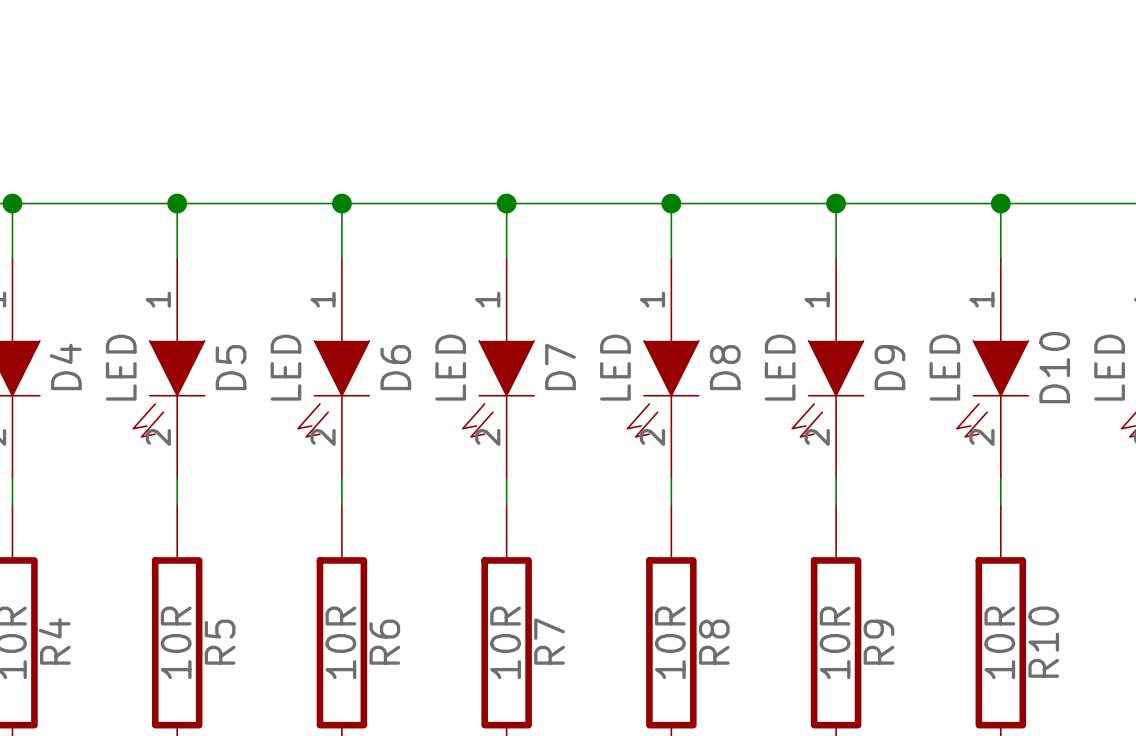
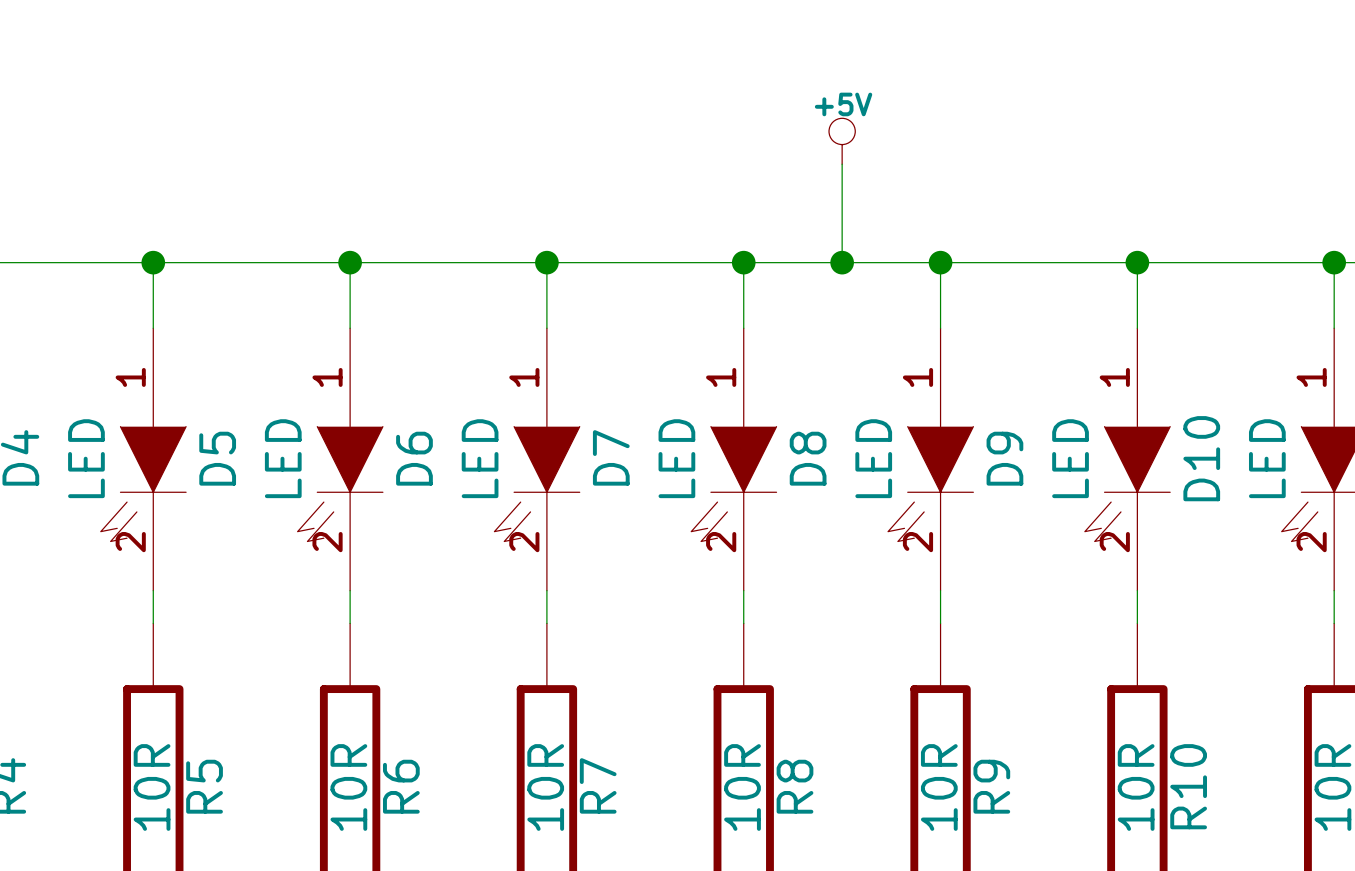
power symbol: none -> +5V (842, 141)
wire: none -> (842, 164) (842, 262)
junction: none -> (842, 262)

